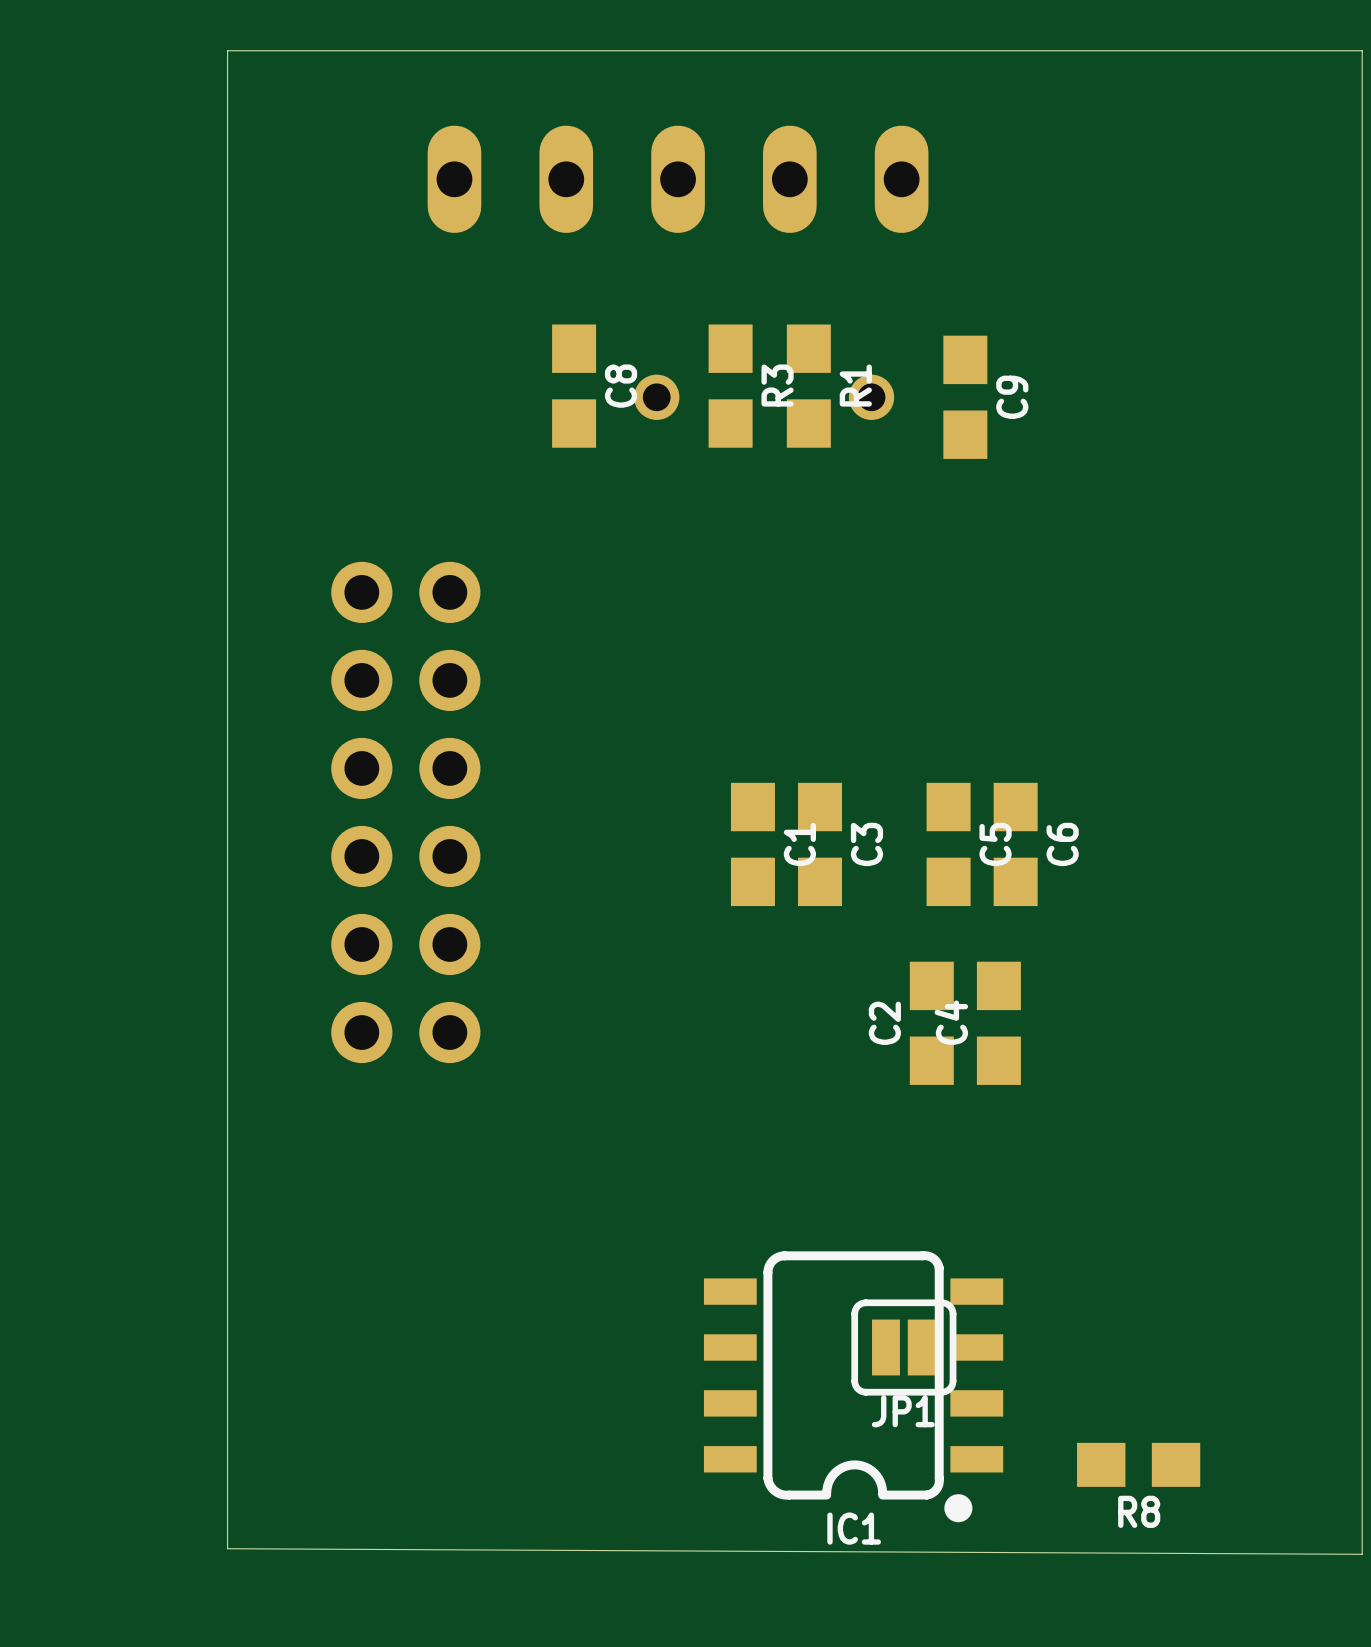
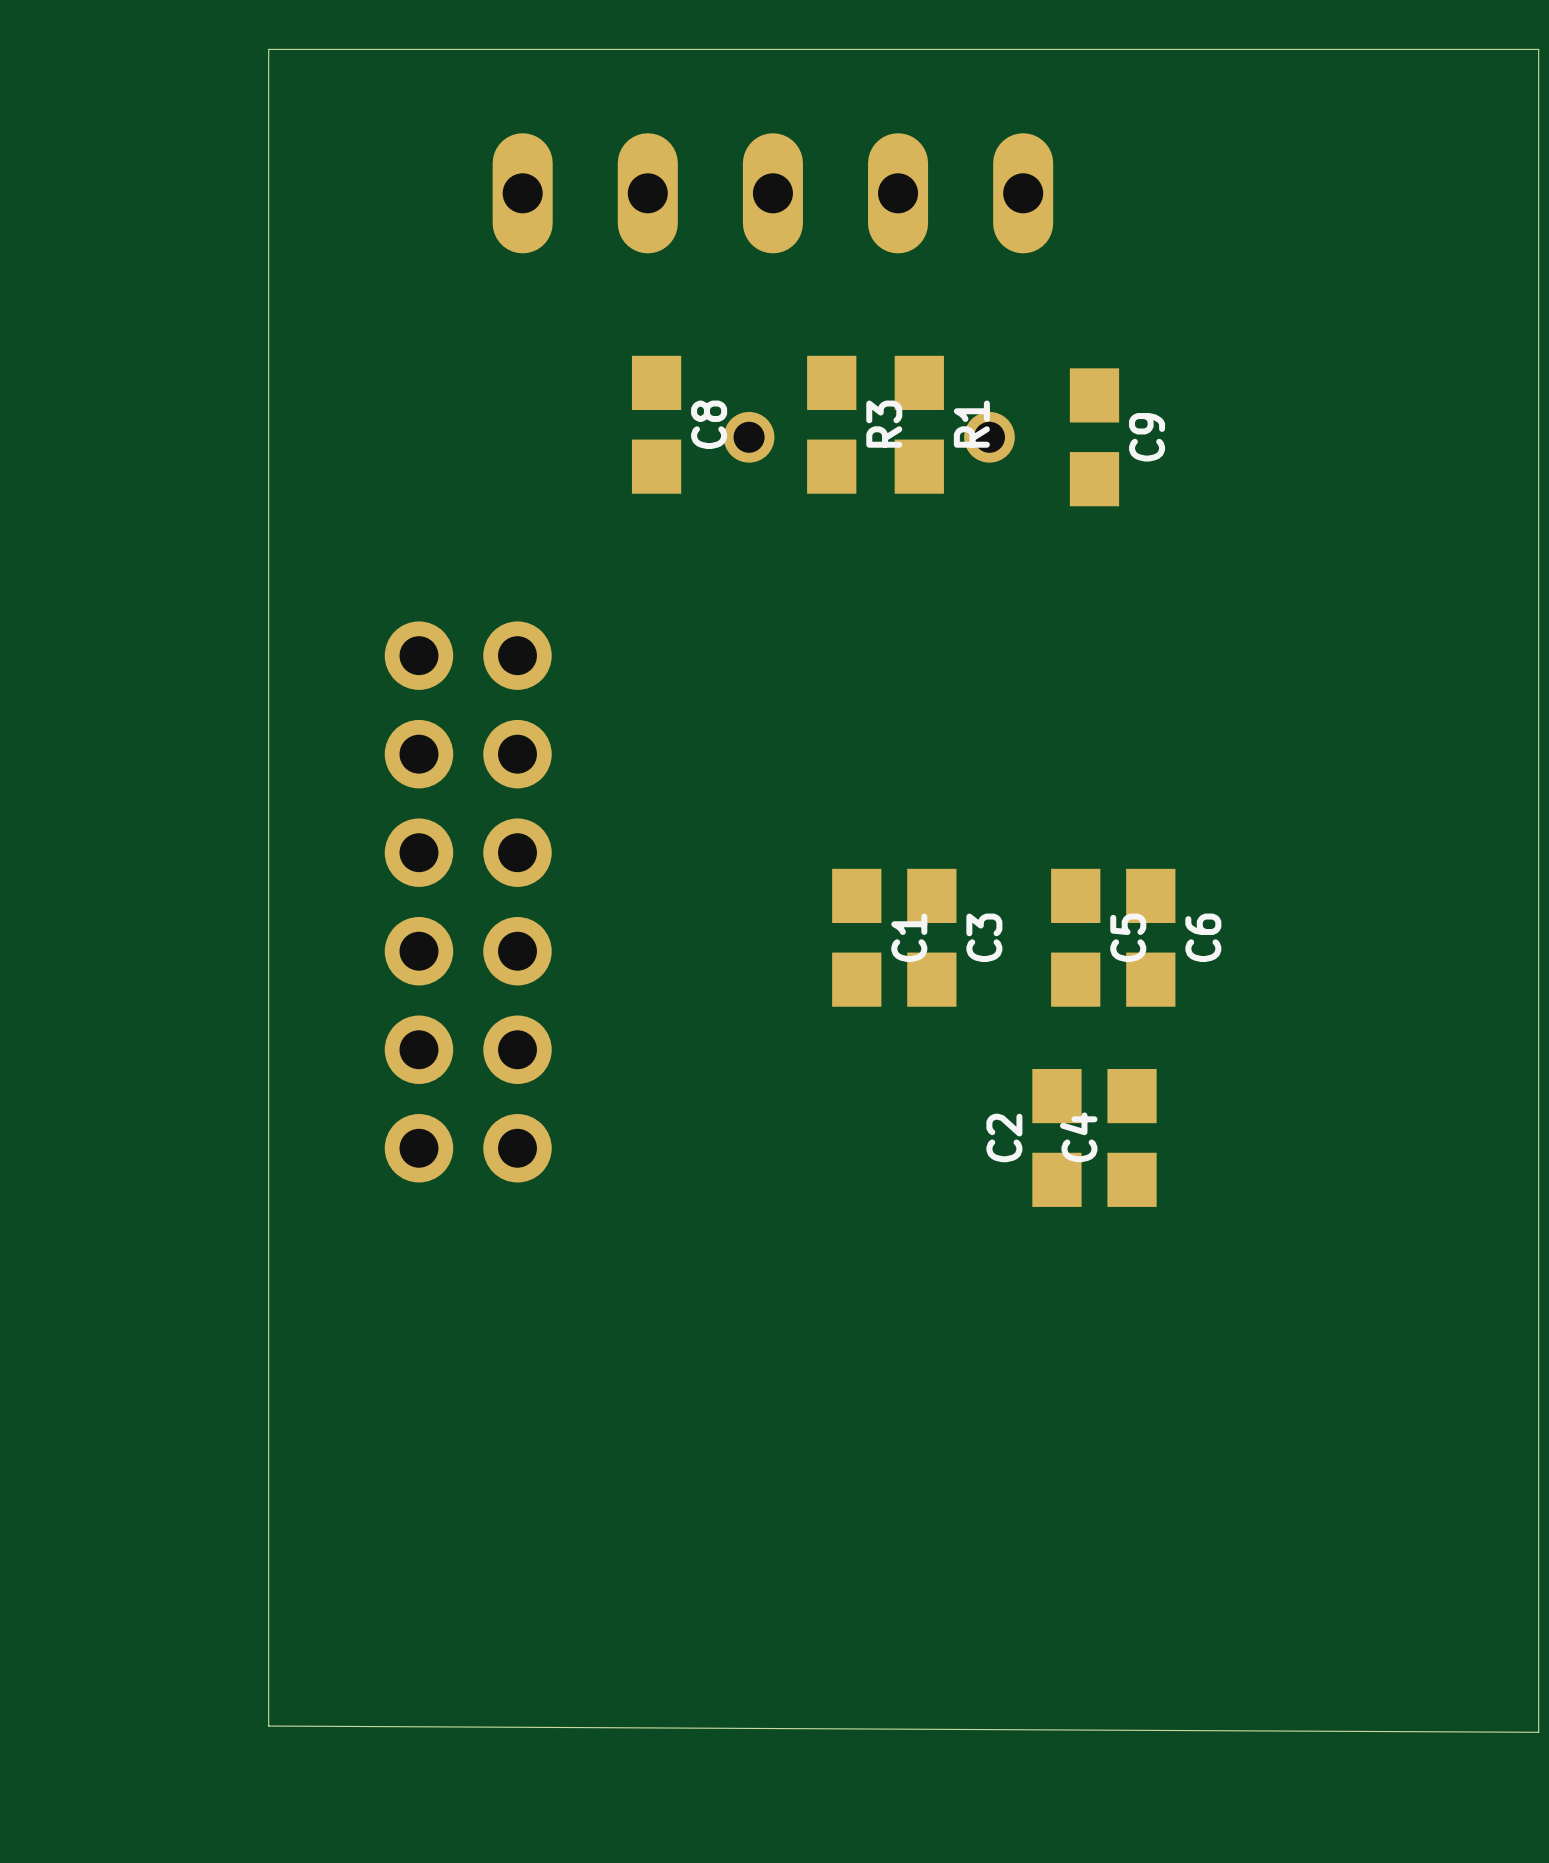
JP1: (903, 1347) -> none
IC1: (853, 1386) -> none
R8: (1138, 1464) -> none

